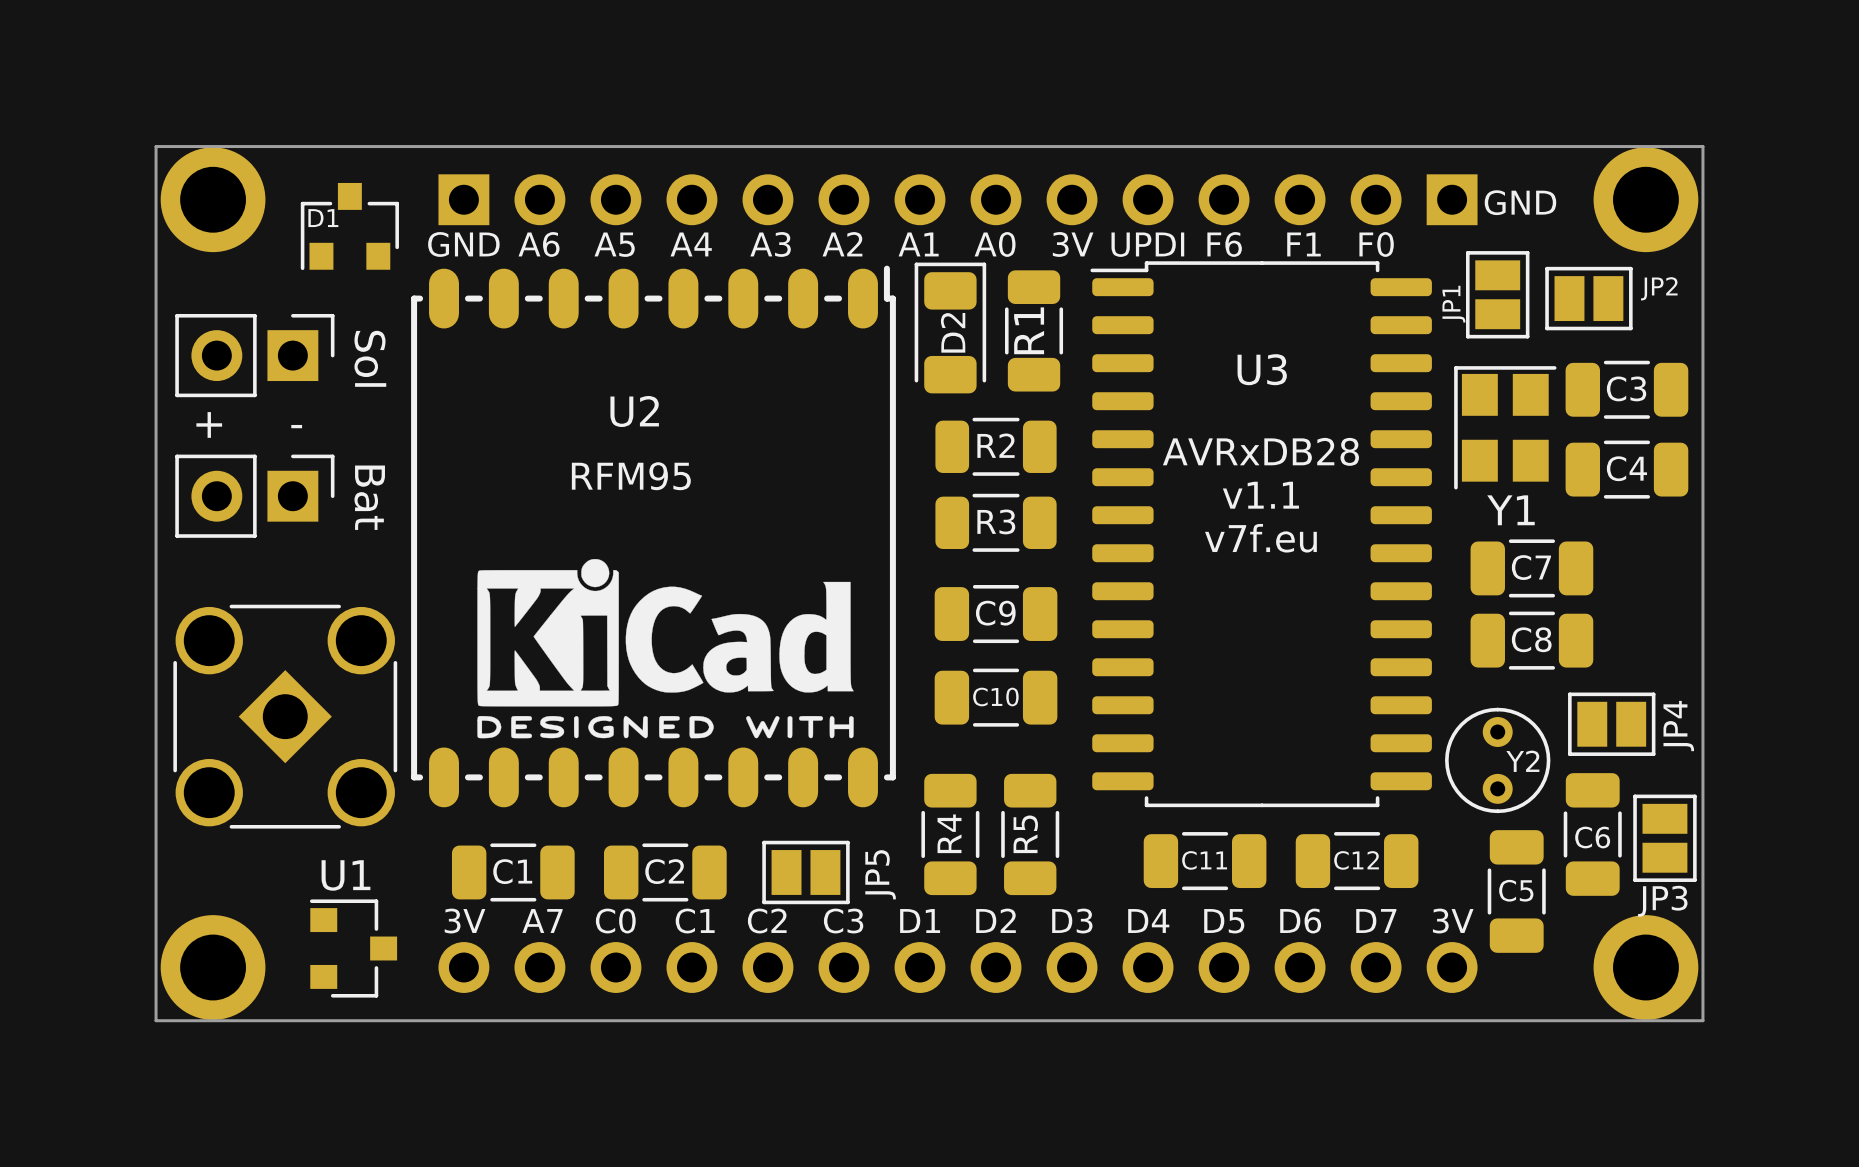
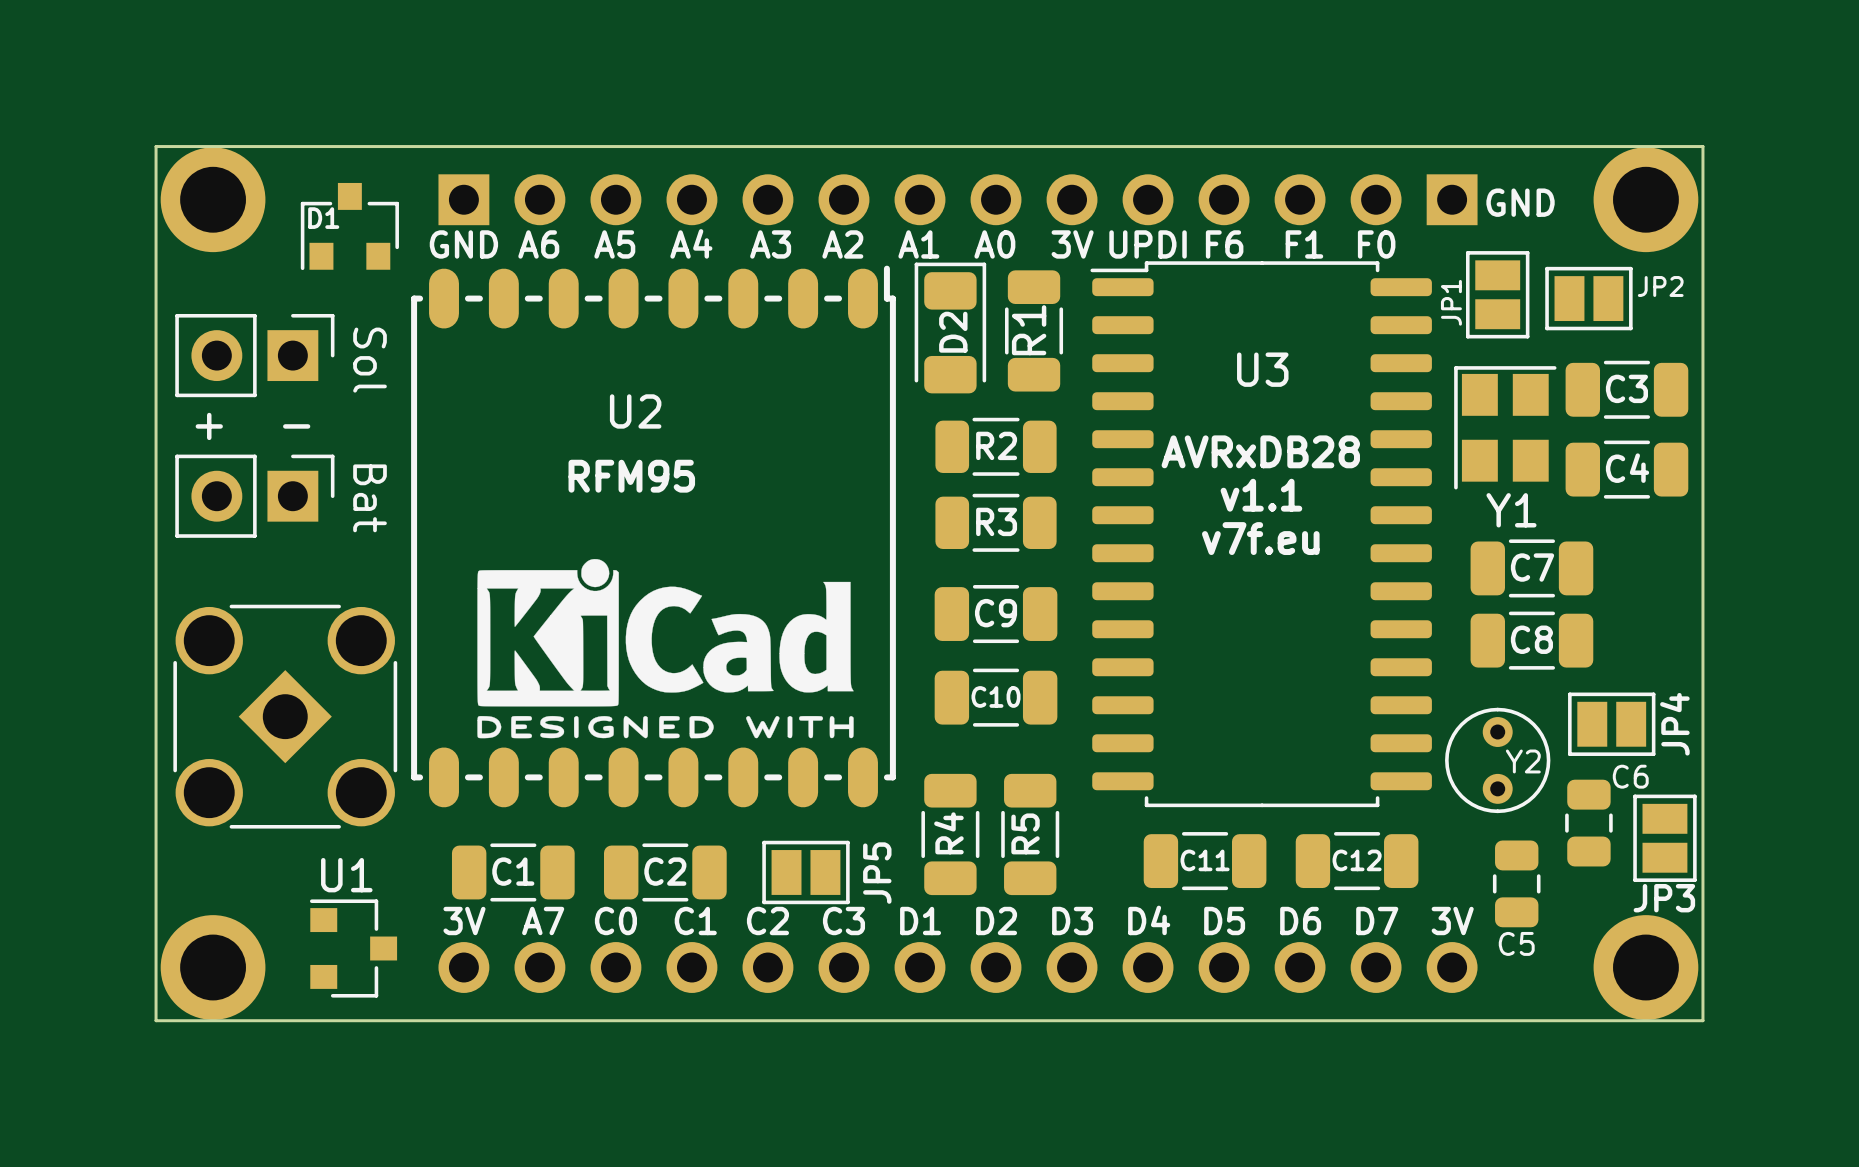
C6 footprint: [1563, 773, 1622, 896] -> [1565, 779, 1613, 867]
C5 footprint: [1487, 830, 1546, 953] -> [1492, 840, 1541, 928]
C6 name position: C6 (1592, 837) -> C6 (1630, 776)
C5 name position: C5 (1516, 890) -> C5 (1516, 943)

